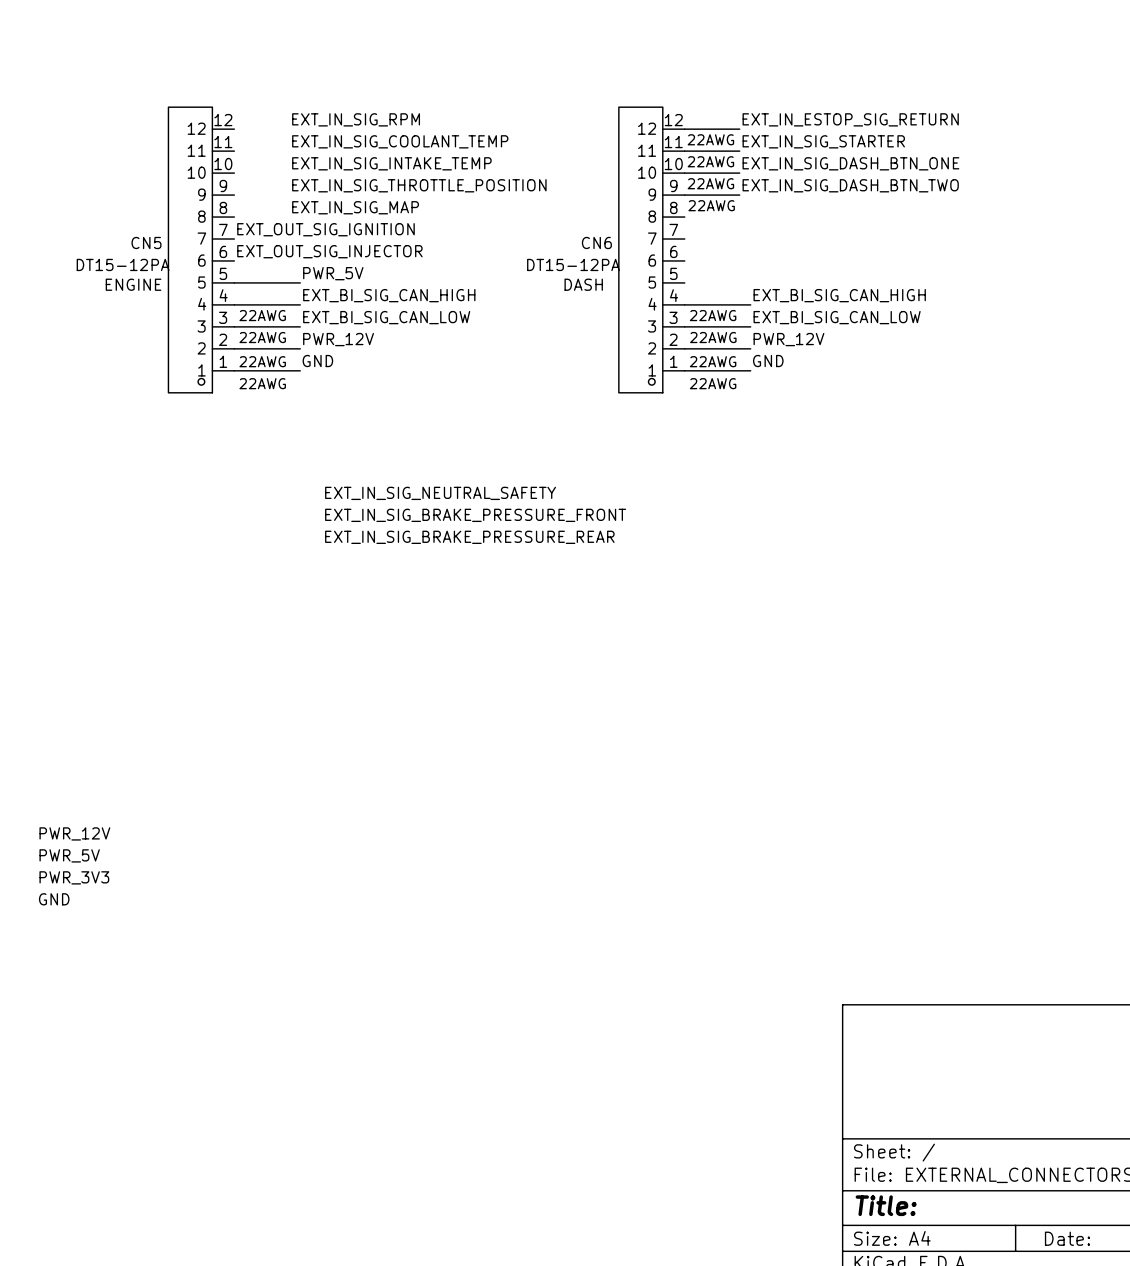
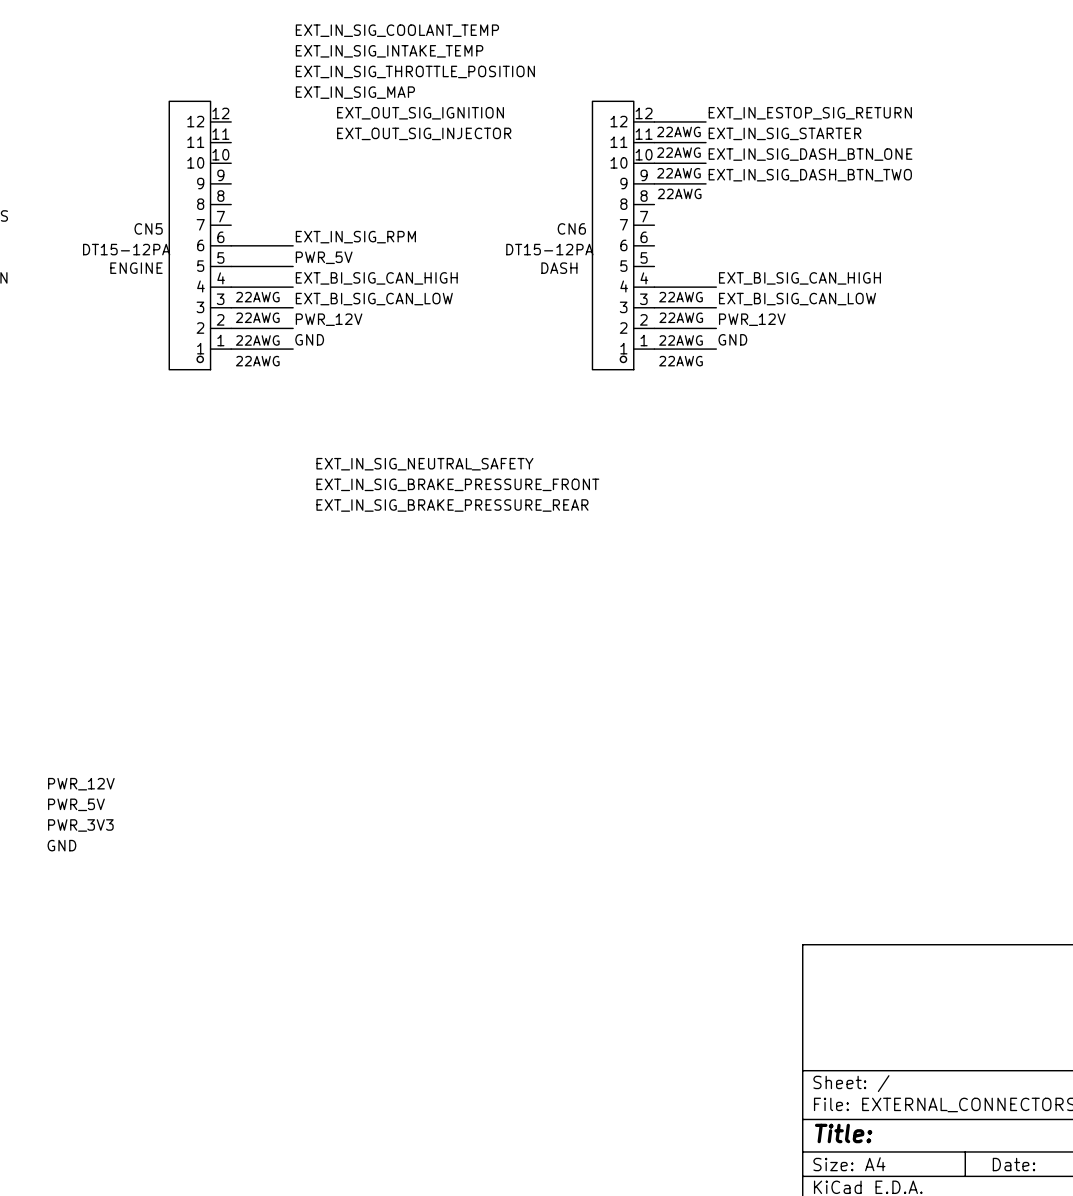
label position: EXT_IN_SIG_RPM (356, 119) -> EXT_IN_SIG_RPM (355, 237)
label position: EXT_IN_SIG_COOLANT_TEMP (400, 141) -> EXT_IN_SIG_COOLANT_TEMP (397, 30)
label position: EXT_IN_SIG_INTAKE_TEMP (391, 163) -> EXT_IN_SIG_INTAKE_TEMP (389, 51)
label position: EXT_IN_SIG_THROTTLE_POSITION (419, 185) -> EXT_IN_SIG_THROTTLE_POSITION (415, 71)
label position: EXT_IN_SIG_MAP (355, 207) -> EXT_IN_SIG_MAP (355, 92)
label position: EXT_OUT_SIG_IGNITION (325, 229) -> EXT_OUT_SIG_IGNITION (420, 113)
label position: EXT_OUT_SIG_INJECTOR (329, 251) -> EXT_OUT_SIG_INJECTOR (424, 133)
wire: none -> (231, 245) (293, 245)

